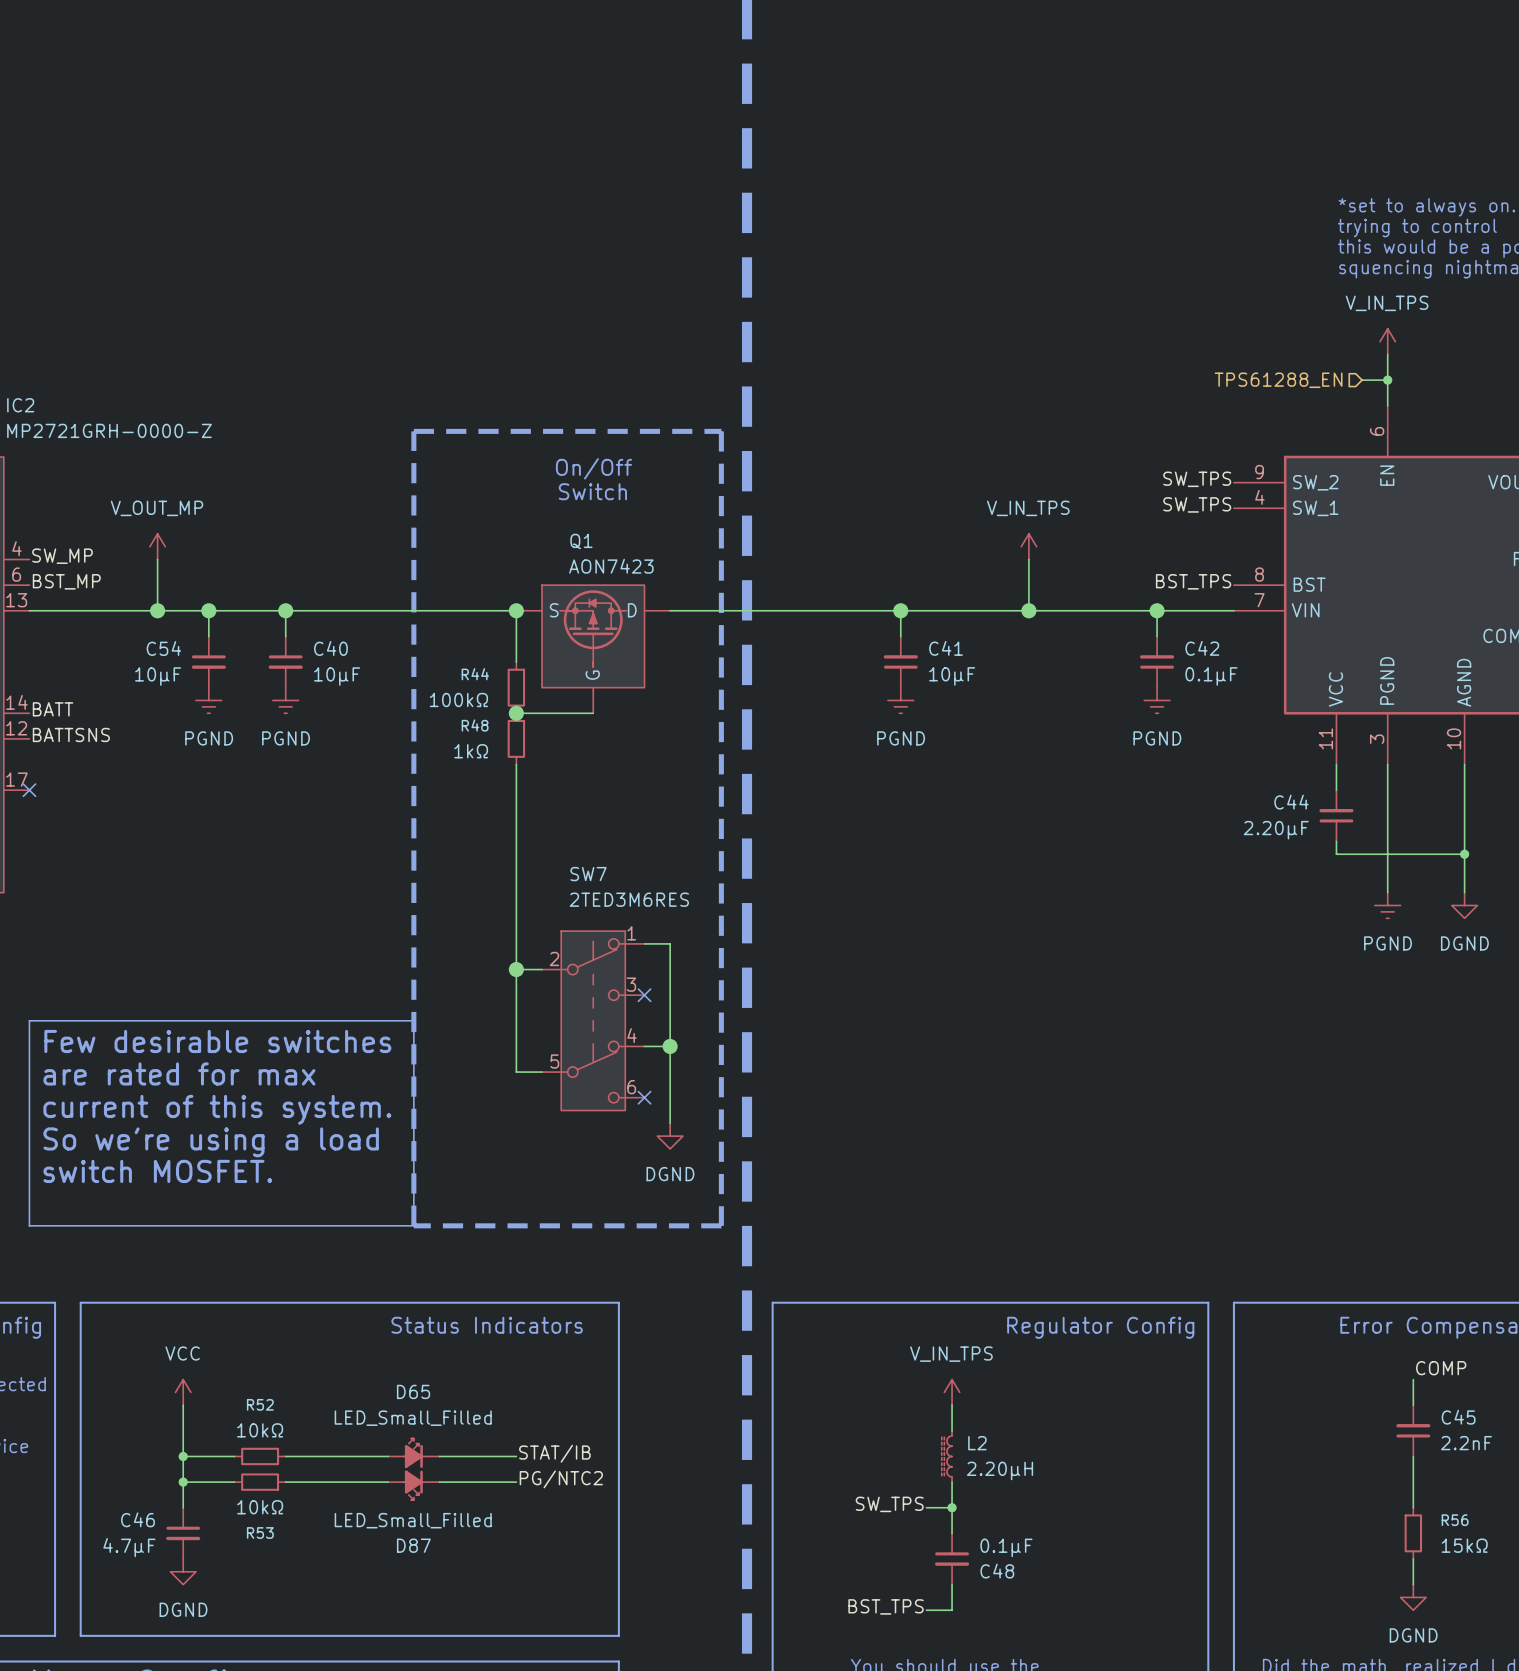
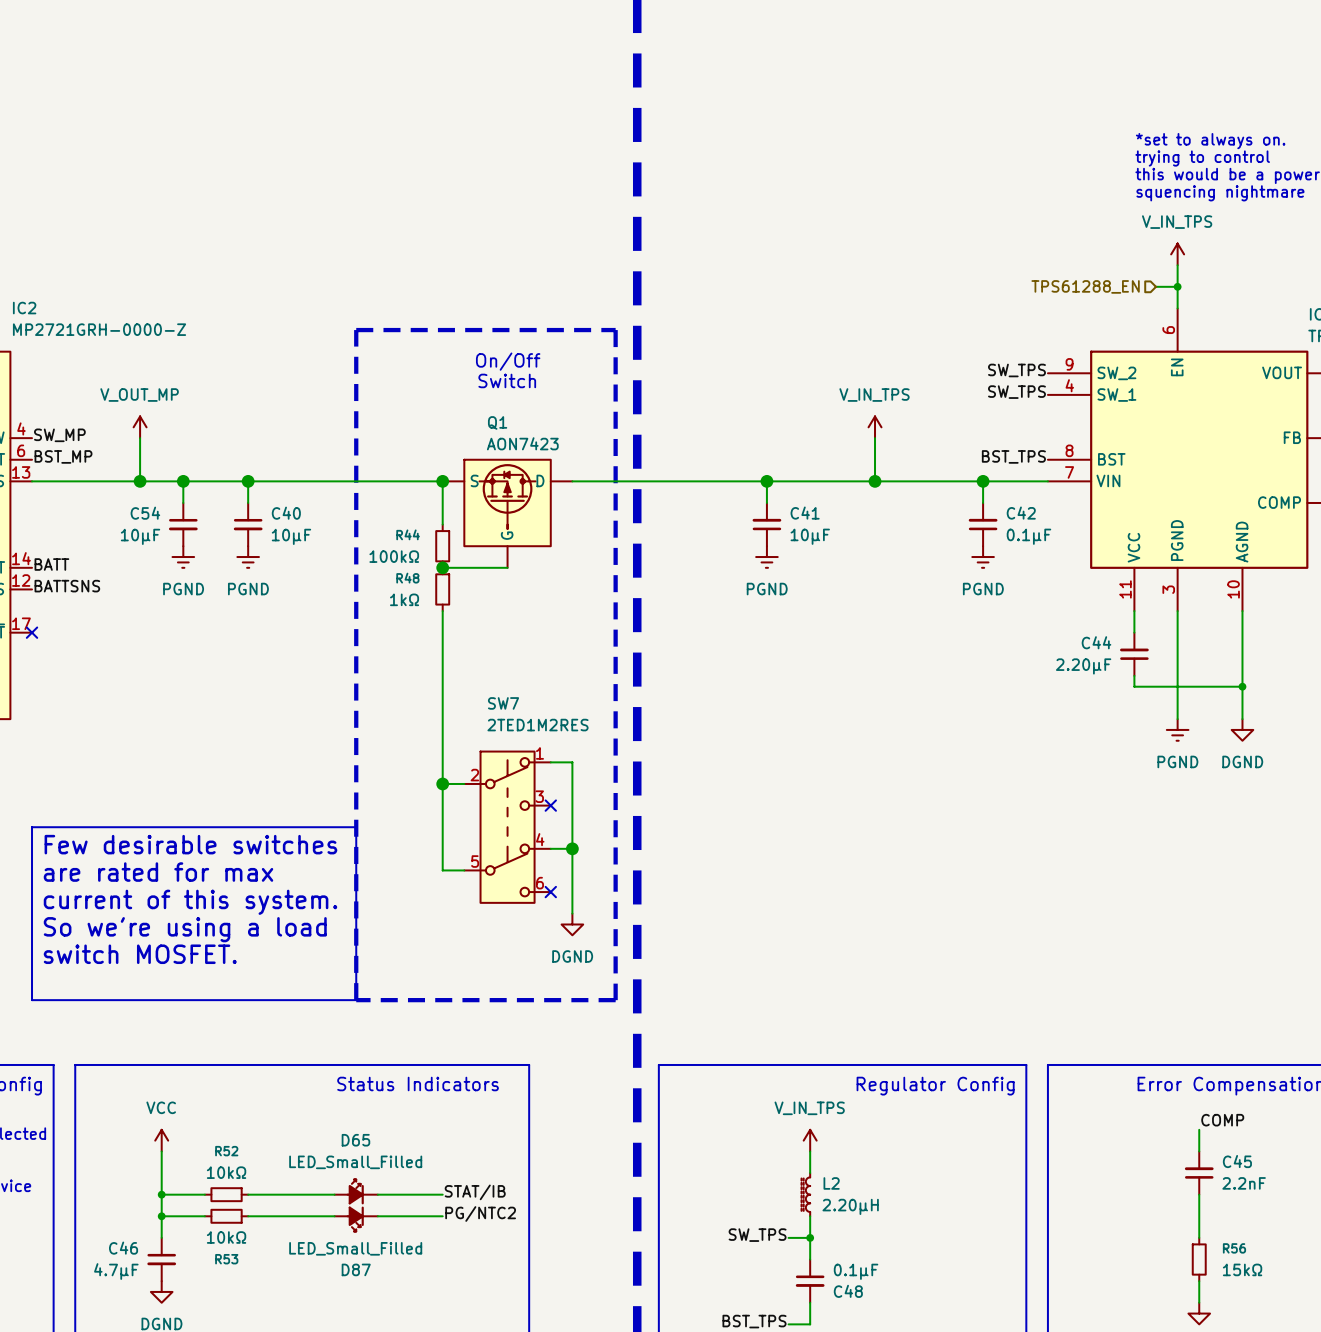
SW7 value: 2TED3M6RES (629, 899) -> 2TED1M2RES (537, 725)

